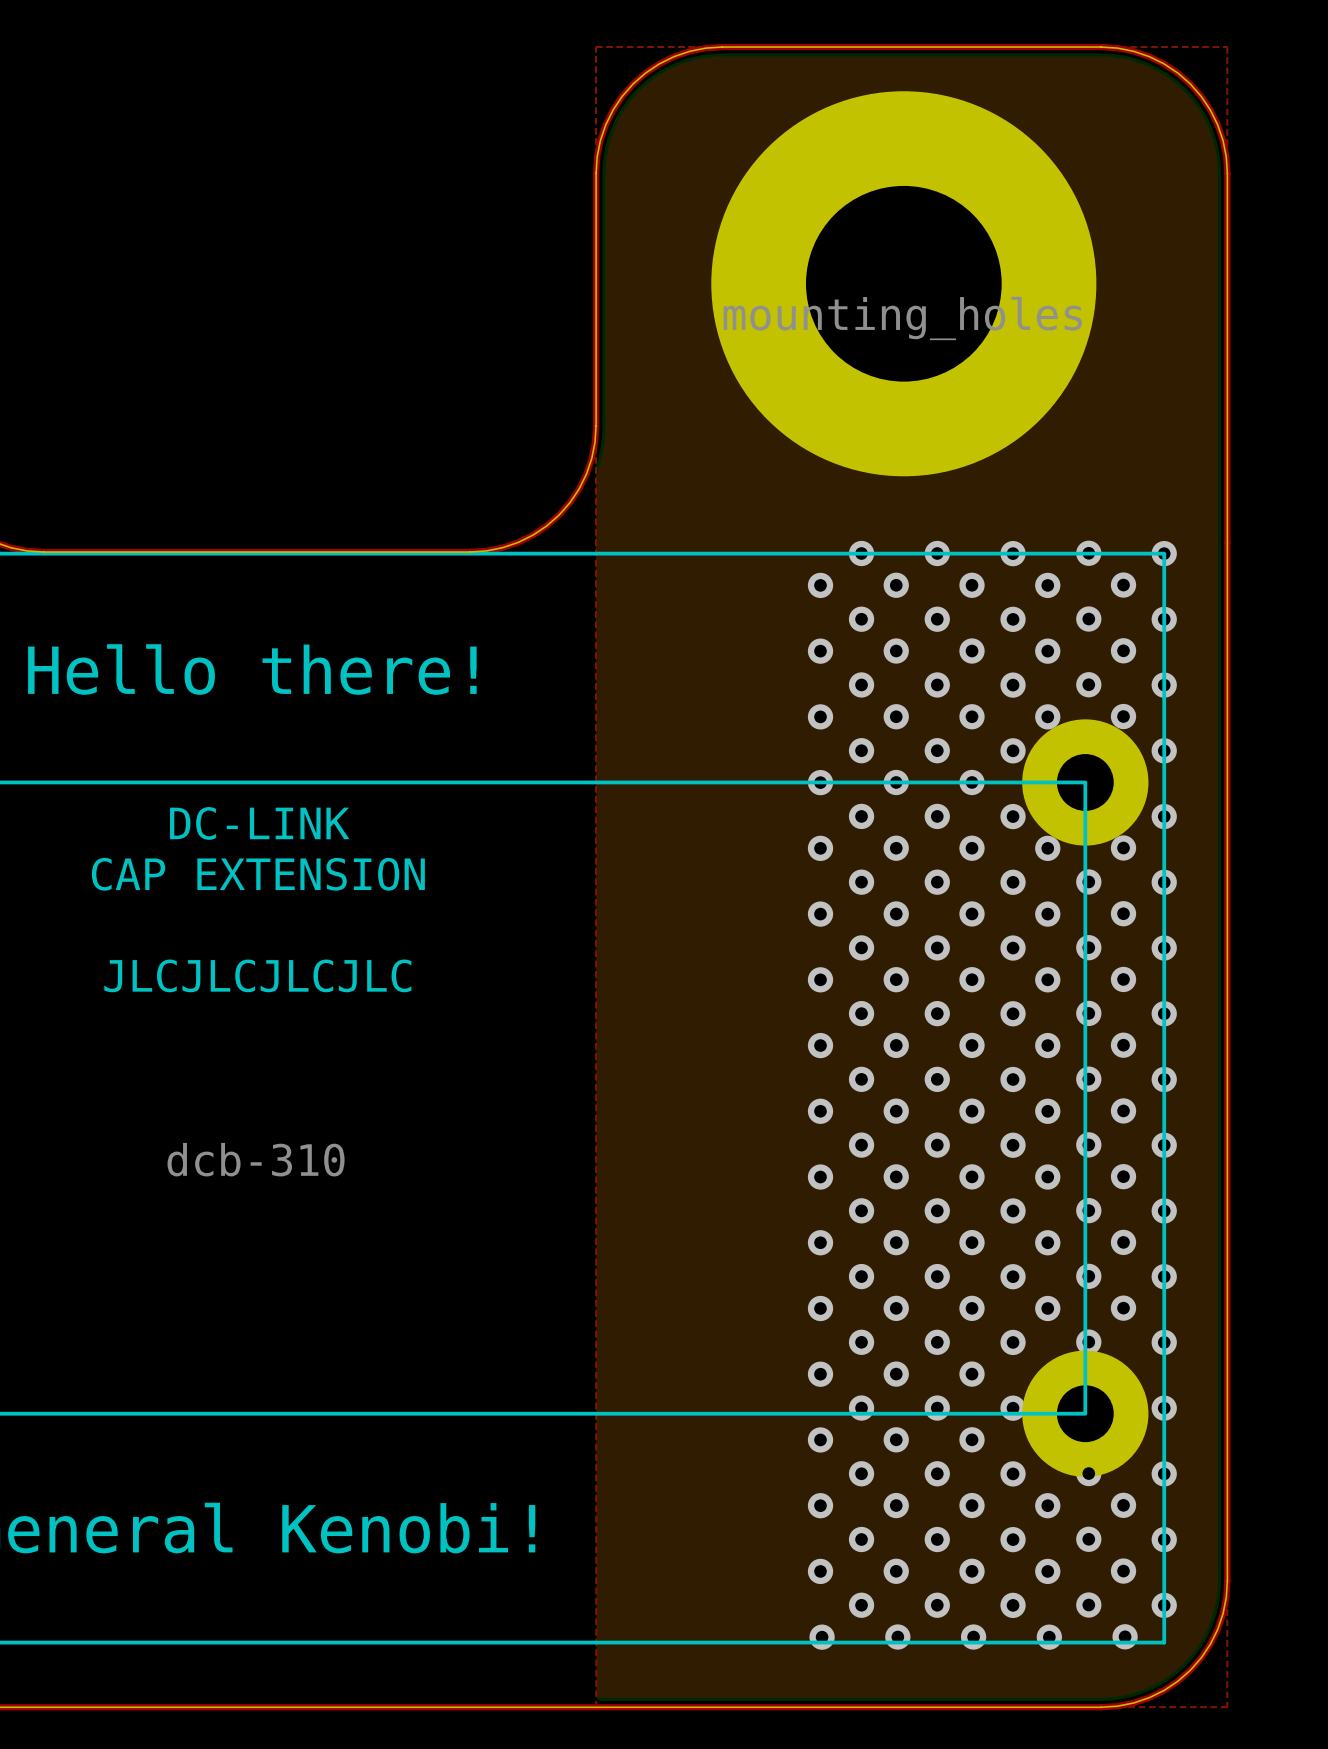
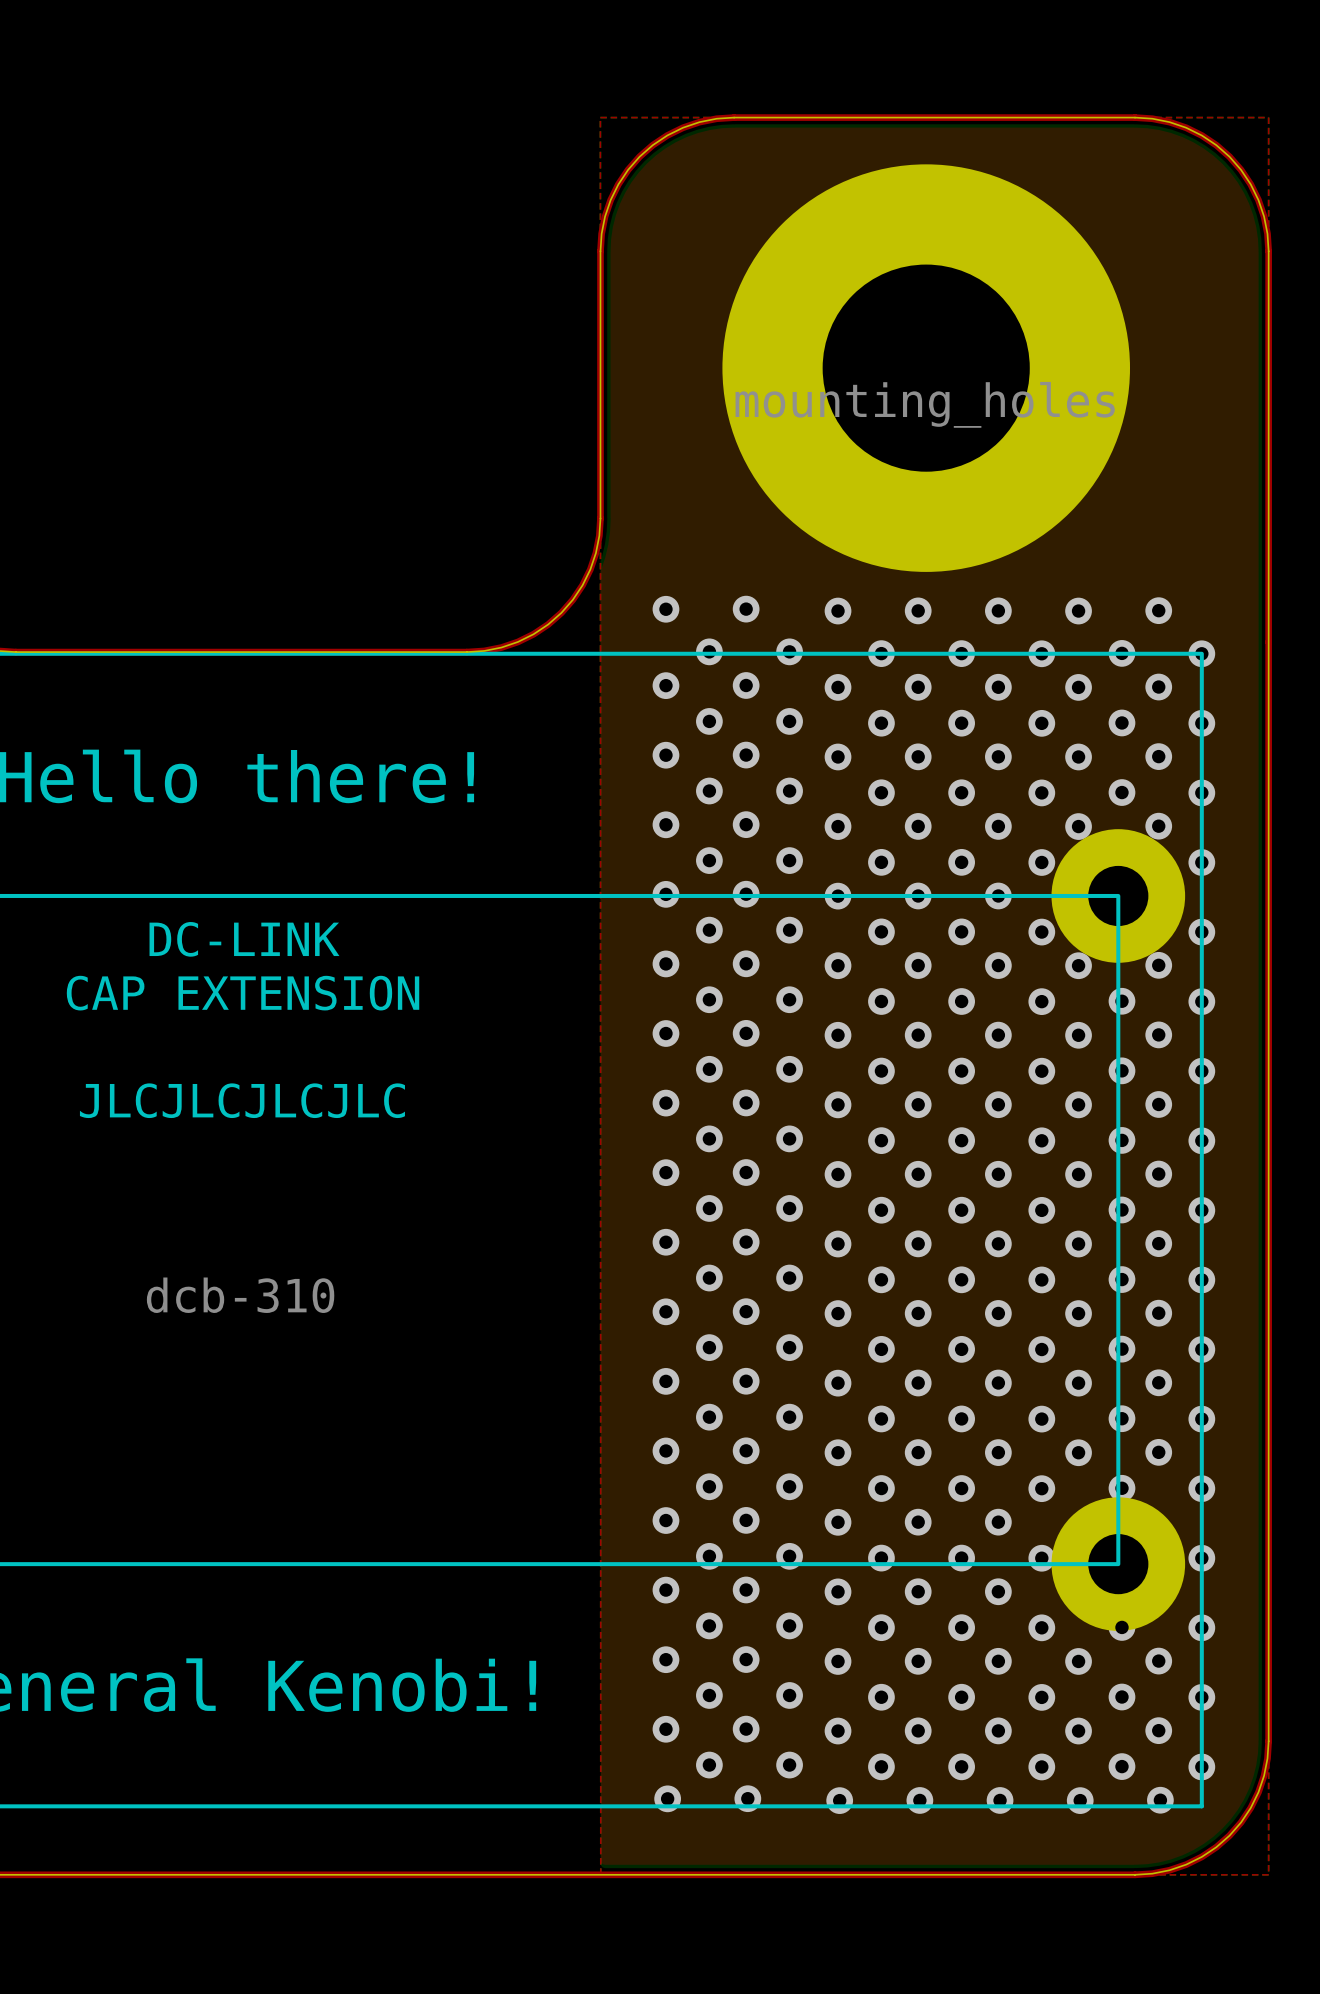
via: none -> (665, 609)
via: none -> (746, 609)
via: none -> (1158, 610)
via: none -> (838, 611)
via: none -> (918, 610)
via: none -> (998, 610)
via: none -> (1078, 611)
via: none -> (709, 651)
via: none -> (789, 651)
via: none -> (665, 685)
via: none -> (746, 685)
via: none -> (709, 721)
via: none -> (789, 721)
via: none -> (665, 755)
via: none -> (746, 755)
via: none -> (709, 791)
via: none -> (789, 791)
via: none -> (665, 824)
via: none -> (746, 824)
via: none -> (709, 860)
via: none -> (789, 860)
via: none -> (665, 894)
via: none -> (746, 894)
via: none -> (709, 930)
via: none -> (789, 930)
via: none -> (665, 963)
via: none -> (746, 963)
via: none -> (709, 999)
via: none -> (789, 999)
via: none -> (665, 1033)
via: none -> (746, 1033)
via: none -> (709, 1069)
via: none -> (789, 1069)
via: none -> (665, 1103)
via: none -> (746, 1102)
via: none -> (709, 1138)
via: none -> (789, 1138)
via: none -> (665, 1172)
via: none -> (746, 1172)
via: none -> (709, 1208)
via: none -> (789, 1208)
via: none -> (665, 1242)
via: none -> (746, 1242)
via: none -> (709, 1278)
via: none -> (789, 1278)
via: none -> (665, 1311)
via: none -> (746, 1311)
via: none -> (709, 1347)
via: none -> (789, 1347)
via: none -> (746, 1381)
via: none -> (665, 1381)
via: none -> (709, 1417)
via: none -> (789, 1417)
via: none -> (665, 1450)
via: none -> (746, 1450)
via: none -> (709, 1486)
via: none -> (789, 1486)
via: none -> (665, 1520)
via: none -> (746, 1520)
via: none -> (709, 1556)
via: none -> (789, 1556)
via: none -> (665, 1590)
via: none -> (746, 1589)
via: none -> (709, 1625)
via: none -> (789, 1625)
via: none -> (746, 1659)
via: none -> (665, 1659)
via: none -> (709, 1695)
via: none -> (789, 1695)
via: none -> (665, 1729)
via: none -> (746, 1729)
via: none -> (709, 1765)
via: none -> (789, 1765)
via: none -> (667, 1798)
via: none -> (747, 1798)

